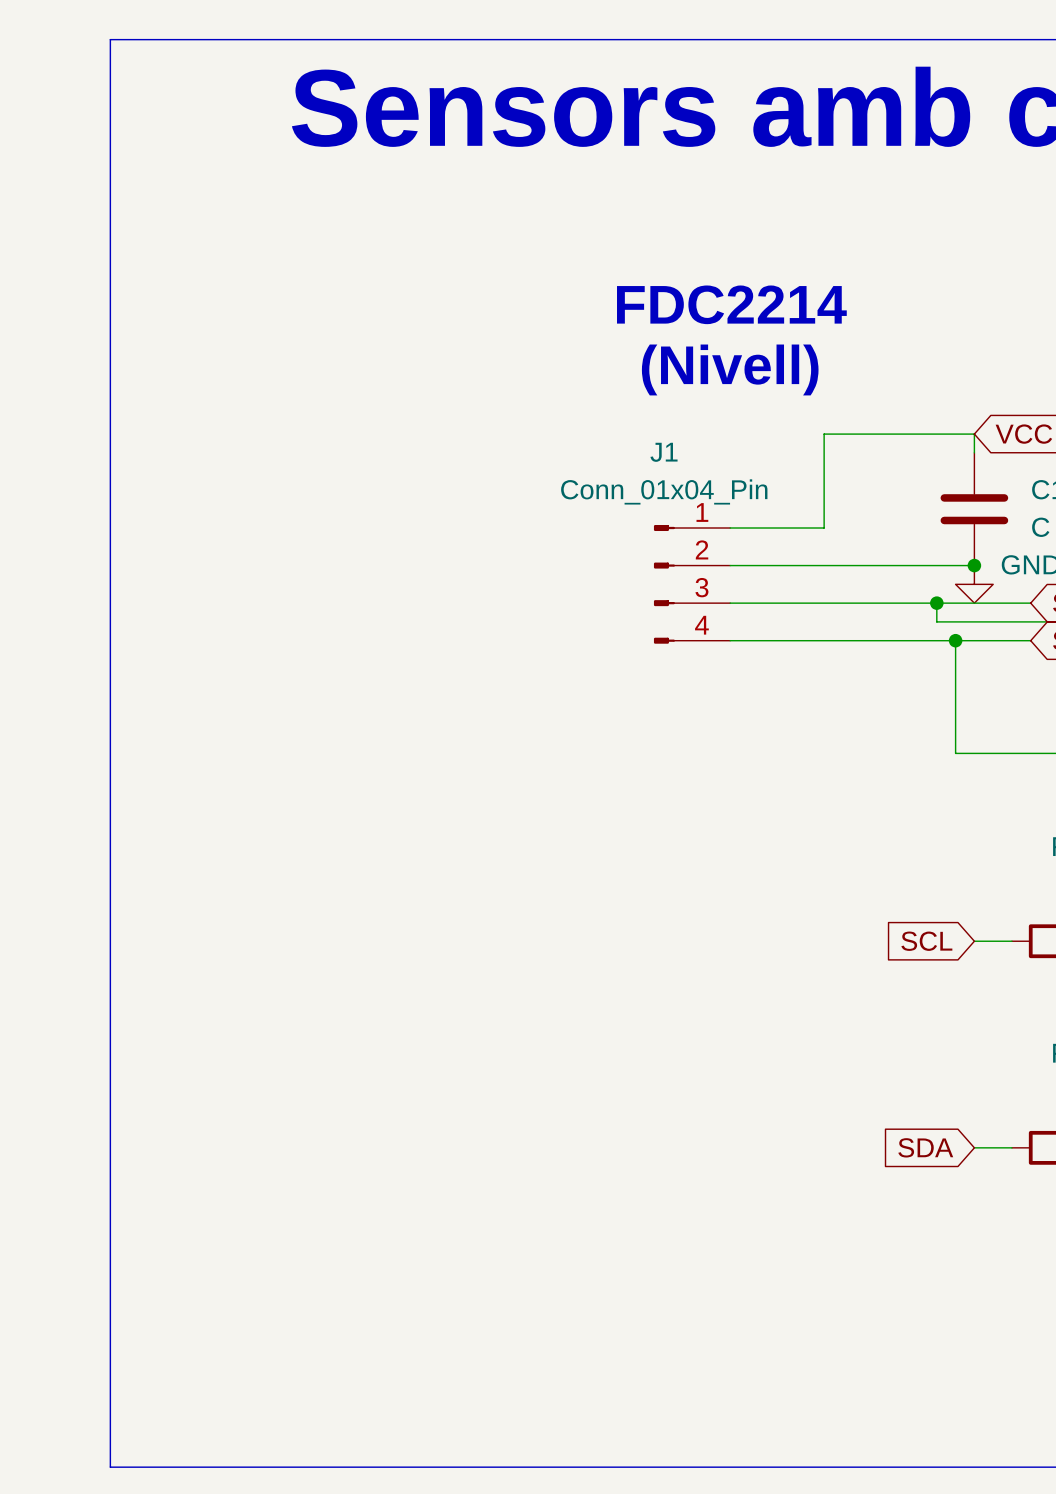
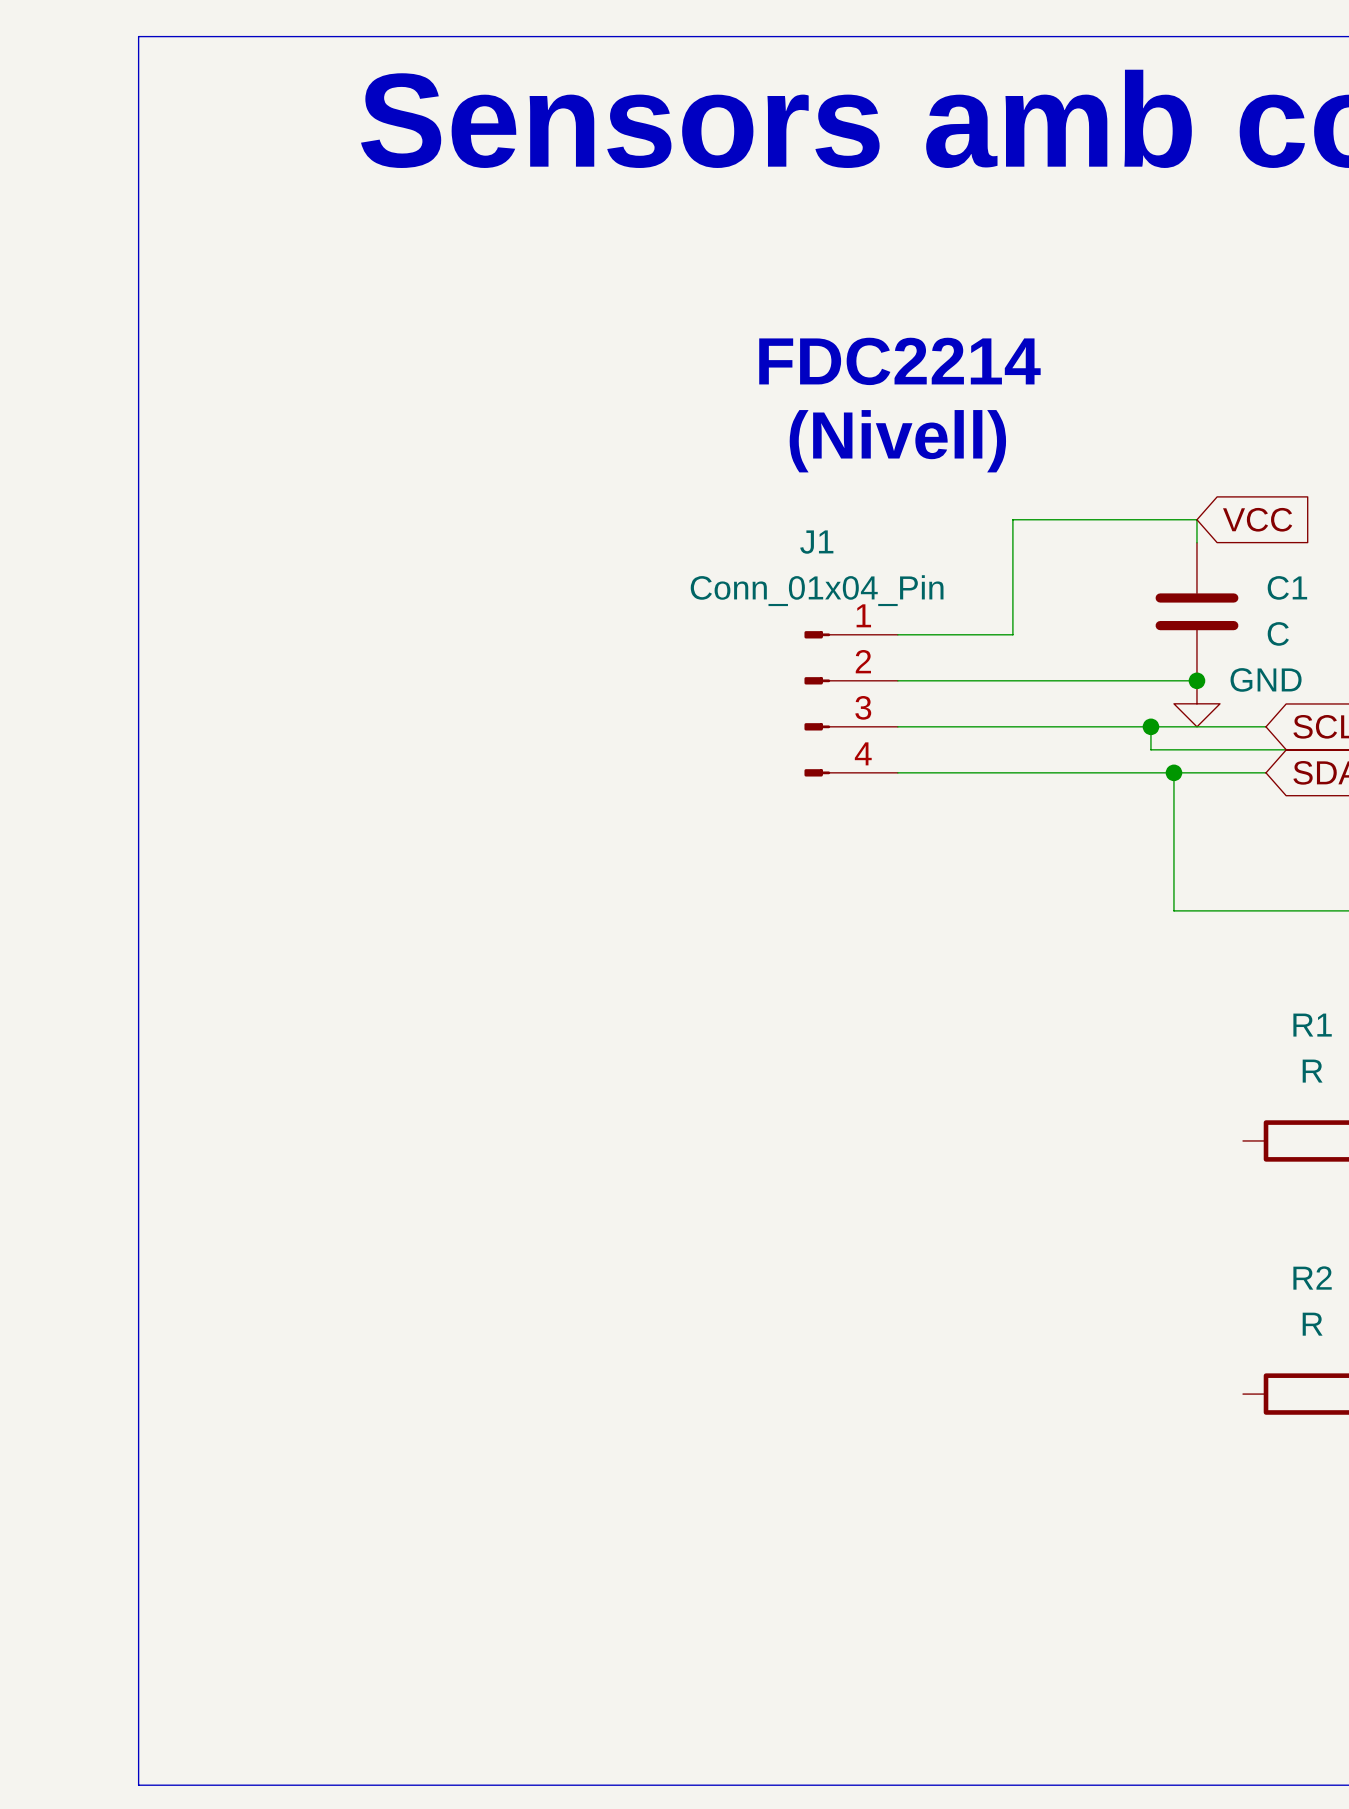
global label: SCL (926, 941) -> none
wire: (974, 941) (1011, 941) -> none
global label: SDA (925, 1147) -> none
wire: (974, 1147) (1011, 1147) -> none

